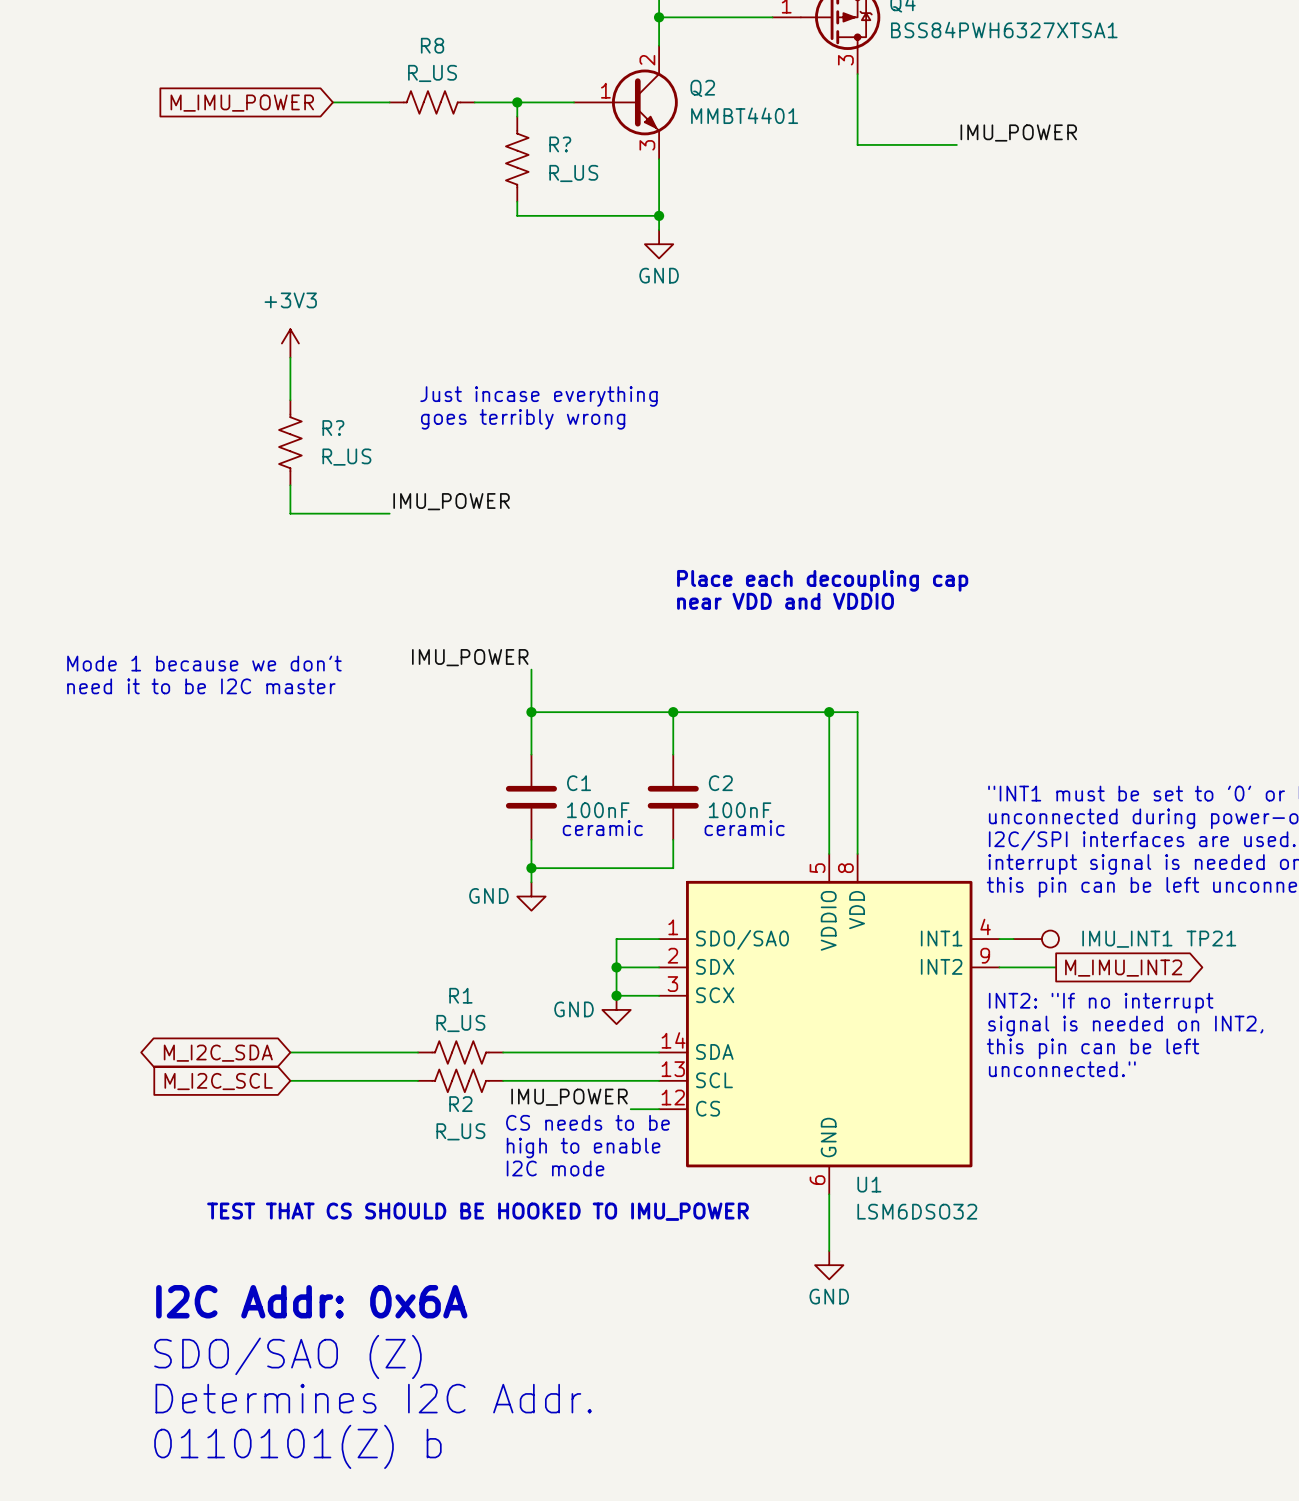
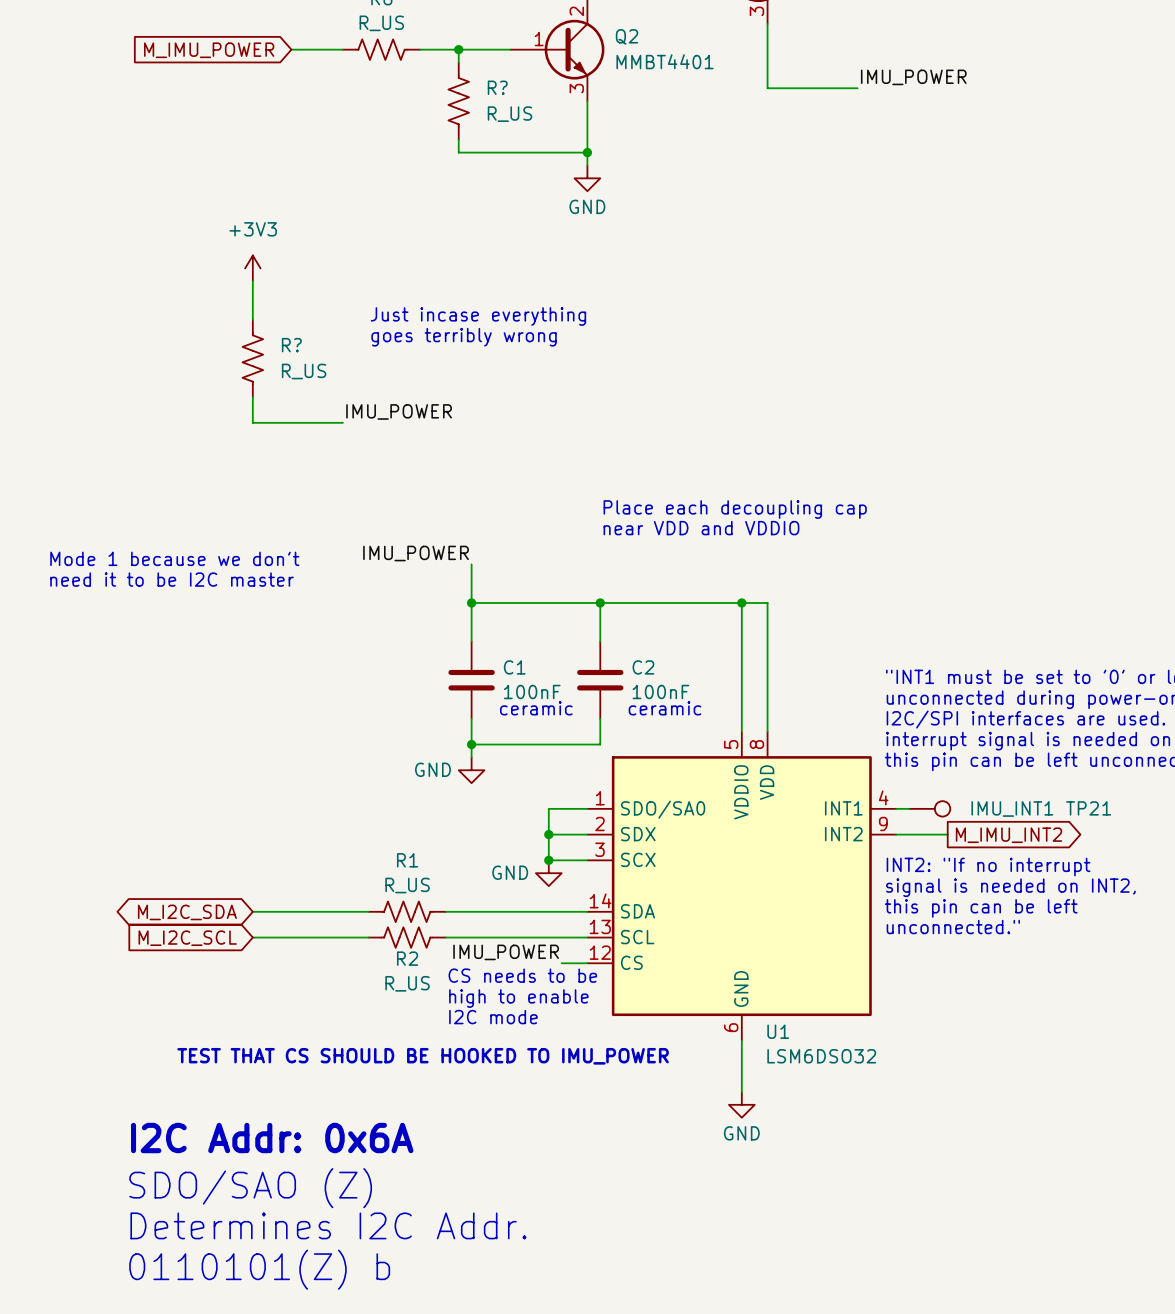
text: Place each decoupling cap (822, 580) -> none
text: near VDD and VDDIO (785, 601) -> Place each decoupling cap (735, 509)
text: none -> near VDD and VDDIO (701, 528)

